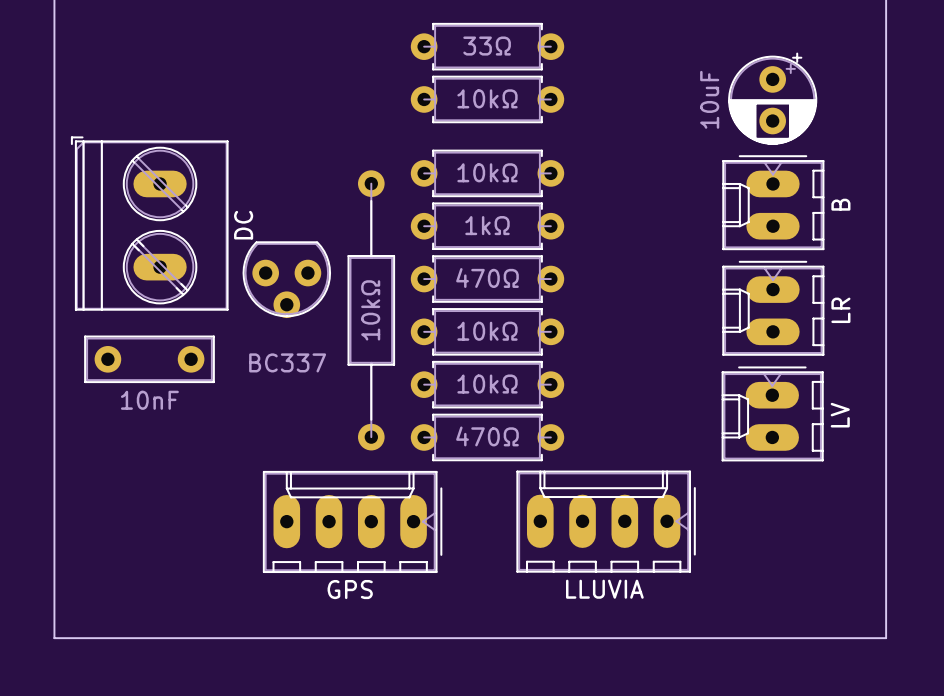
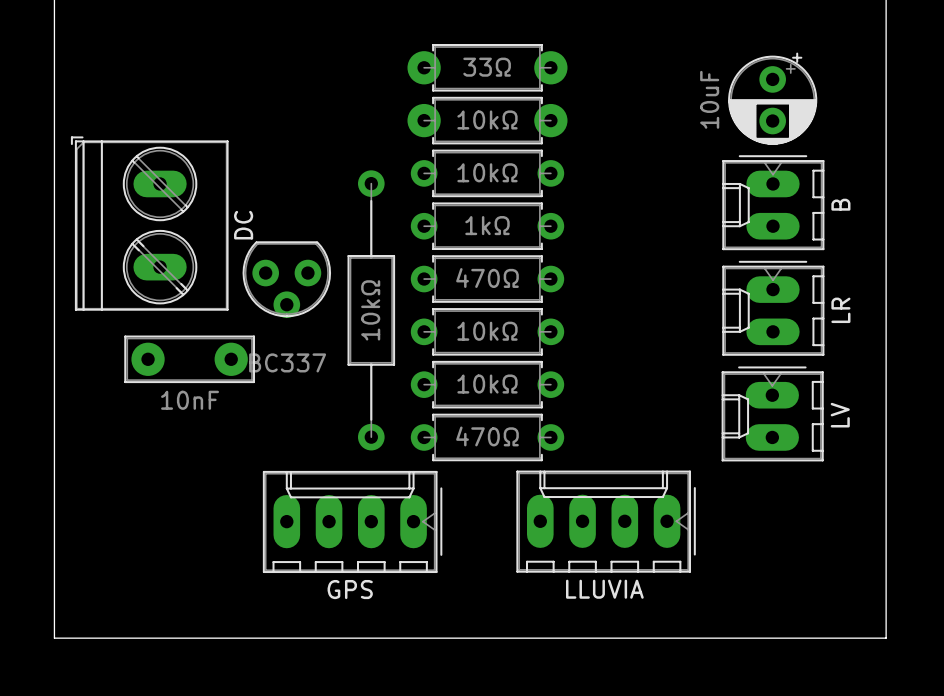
part: 33Ω (487, 46) -> none
part: none -> 33Ω (487, 67)
part: 10kΩ (487, 99) -> none
part: none -> 10kΩ (487, 120)
part: 10nF (149, 359) -> none
part: none -> 10nF (189, 359)

